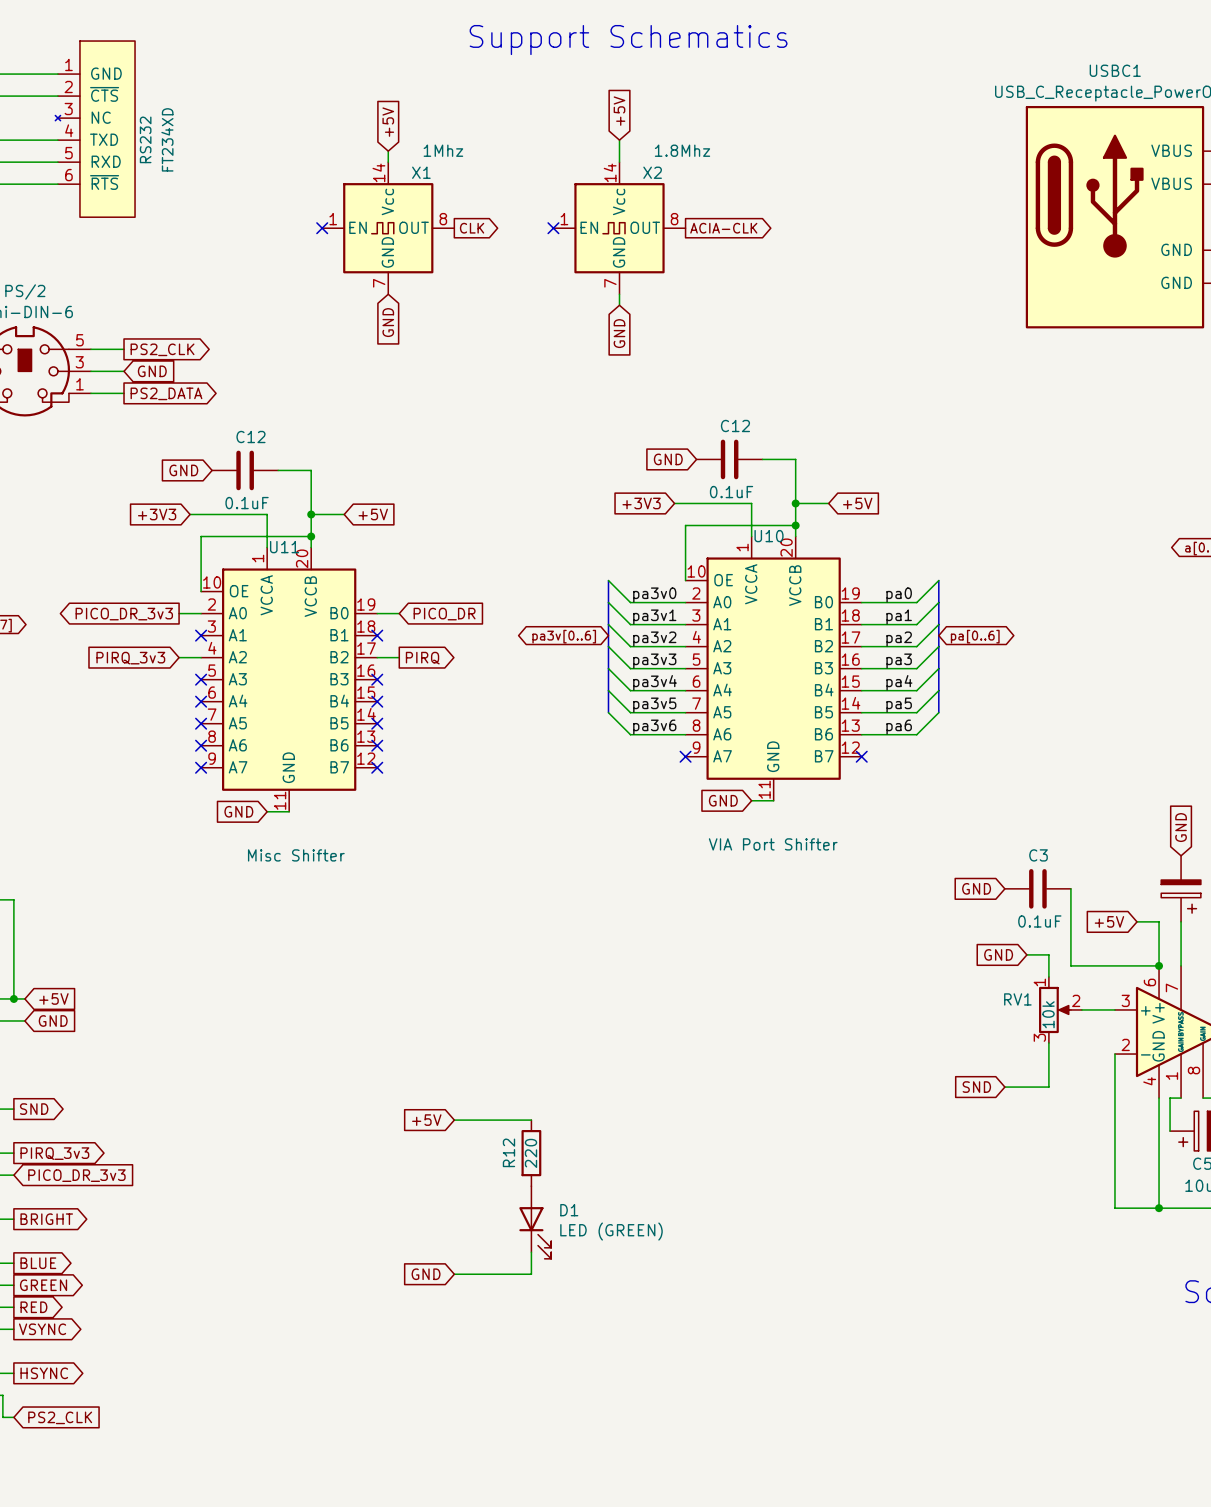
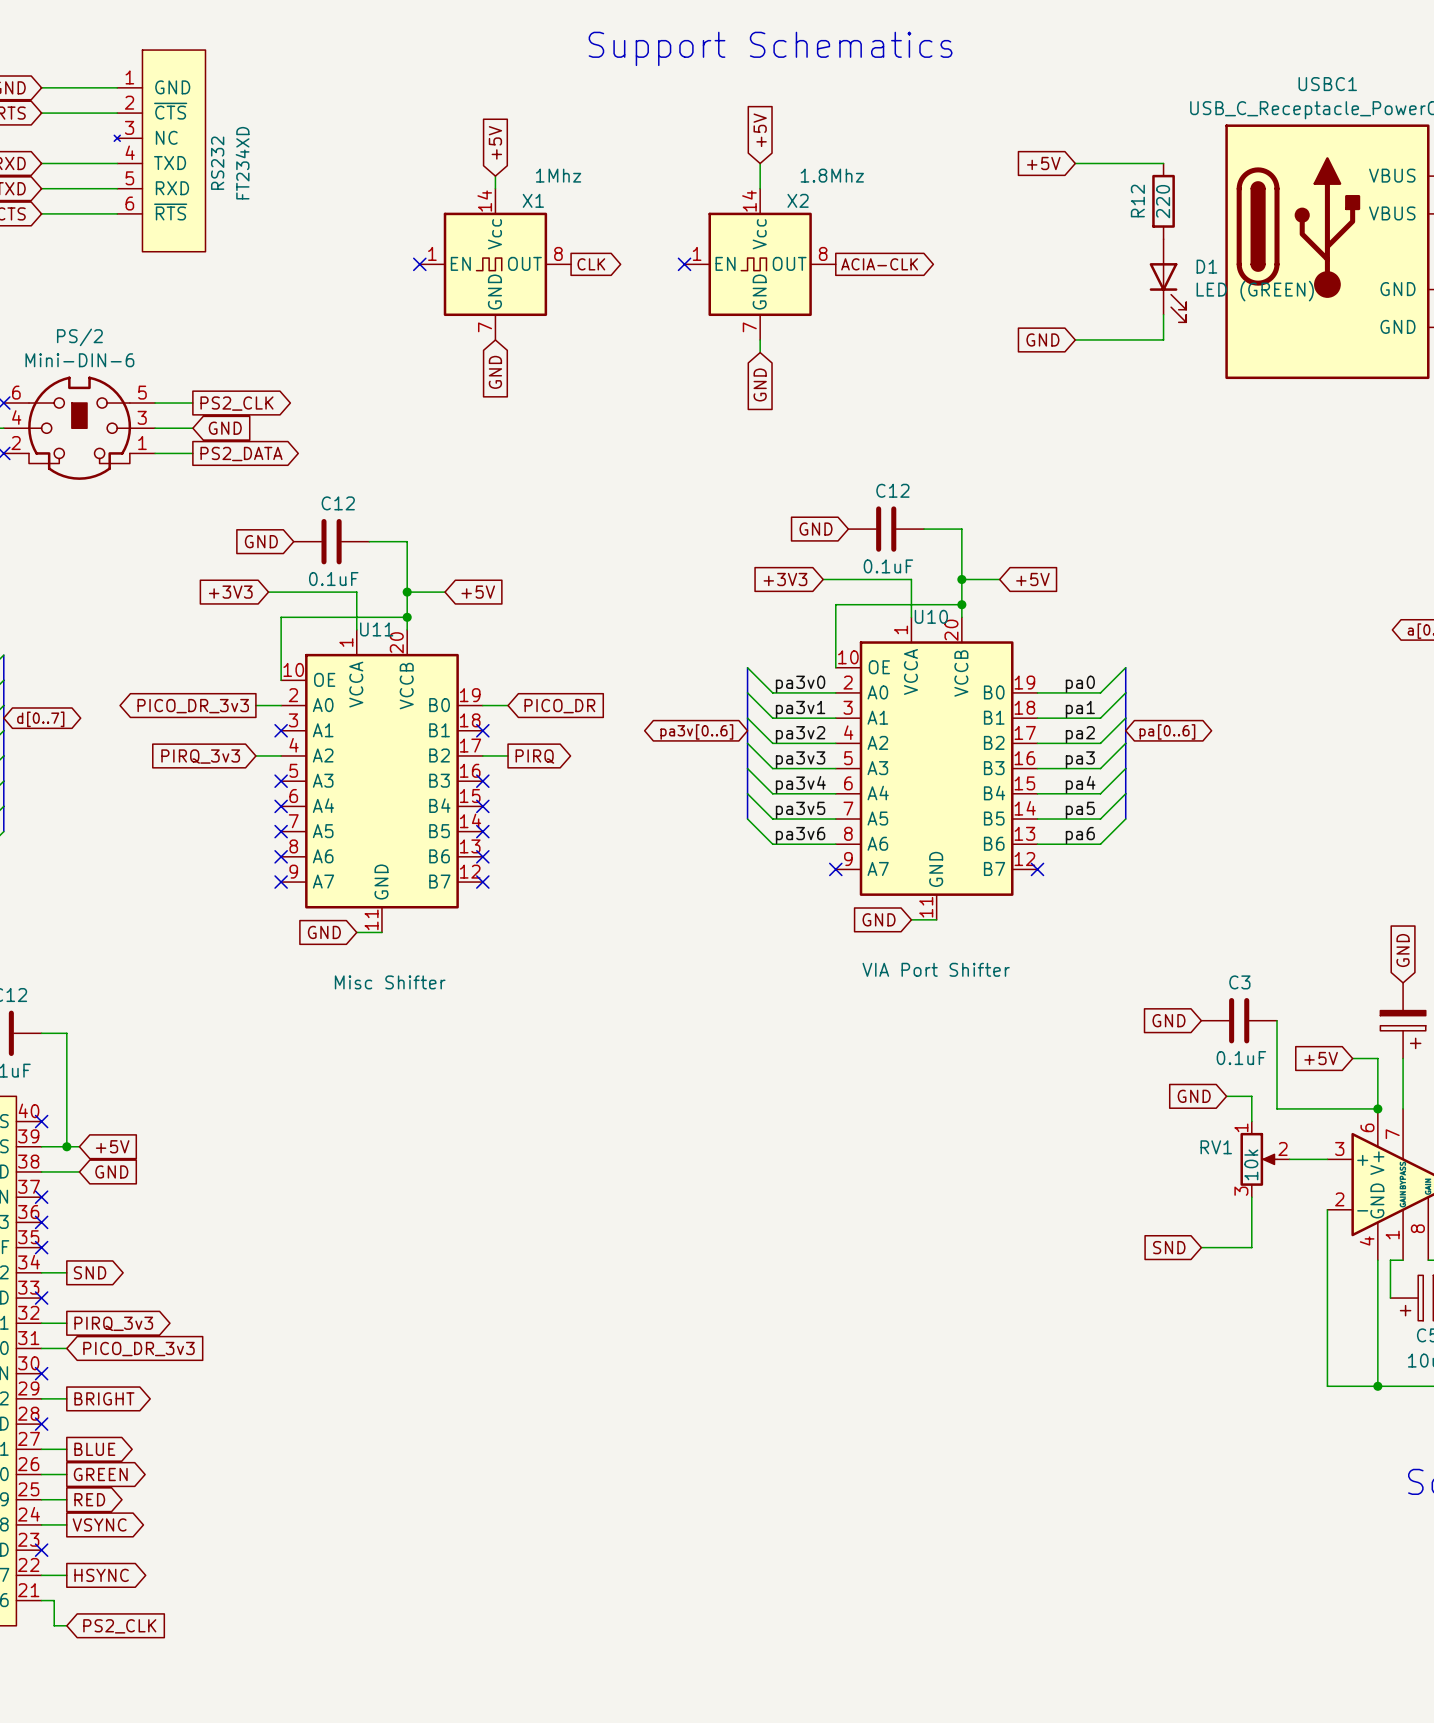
global label: none -> +5V (1043, 163)
wire: none -> (1075, 163) (1163, 163)
wire: none -> (1163, 314) (1163, 339) (1075, 339)
global label: none -> GND (1042, 339)
global label: +5V (426, 1120) -> none
wire: (454, 1120) (531, 1120) -> none
R12 position: (531, 1153) -> (1163, 201)
D1 position: (535, 1222) -> (1167, 280)
wire: (531, 1252) (531, 1274) (454, 1274) -> none
global label: GND (426, 1274) -> none

